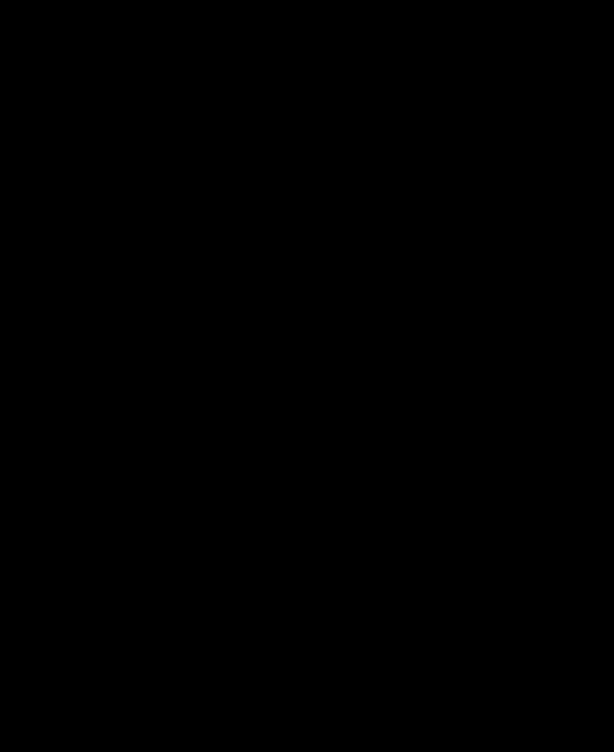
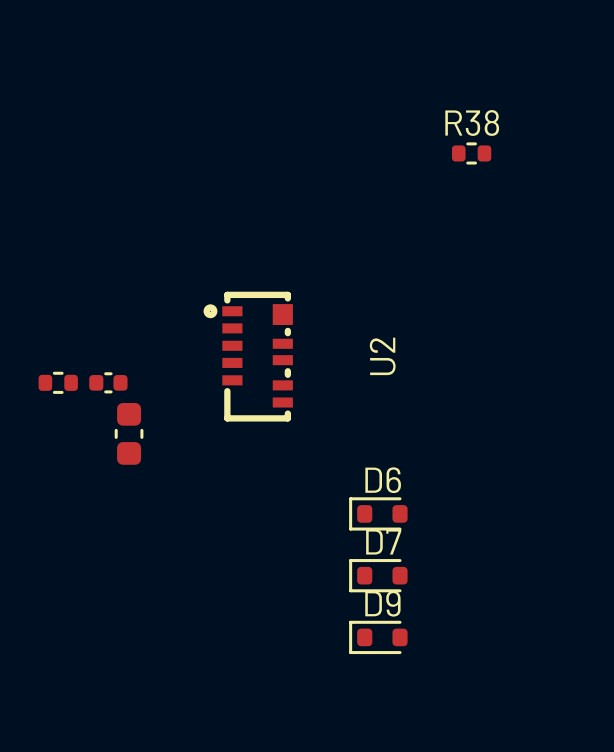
R38: none -> (471, 153)
U2: none -> (248, 356)
part: none -> (58, 382)
part: none -> (108, 382)
part: none -> (129, 433)
D6: none -> (378, 513)
D7: none -> (378, 575)
D9: none -> (378, 637)

